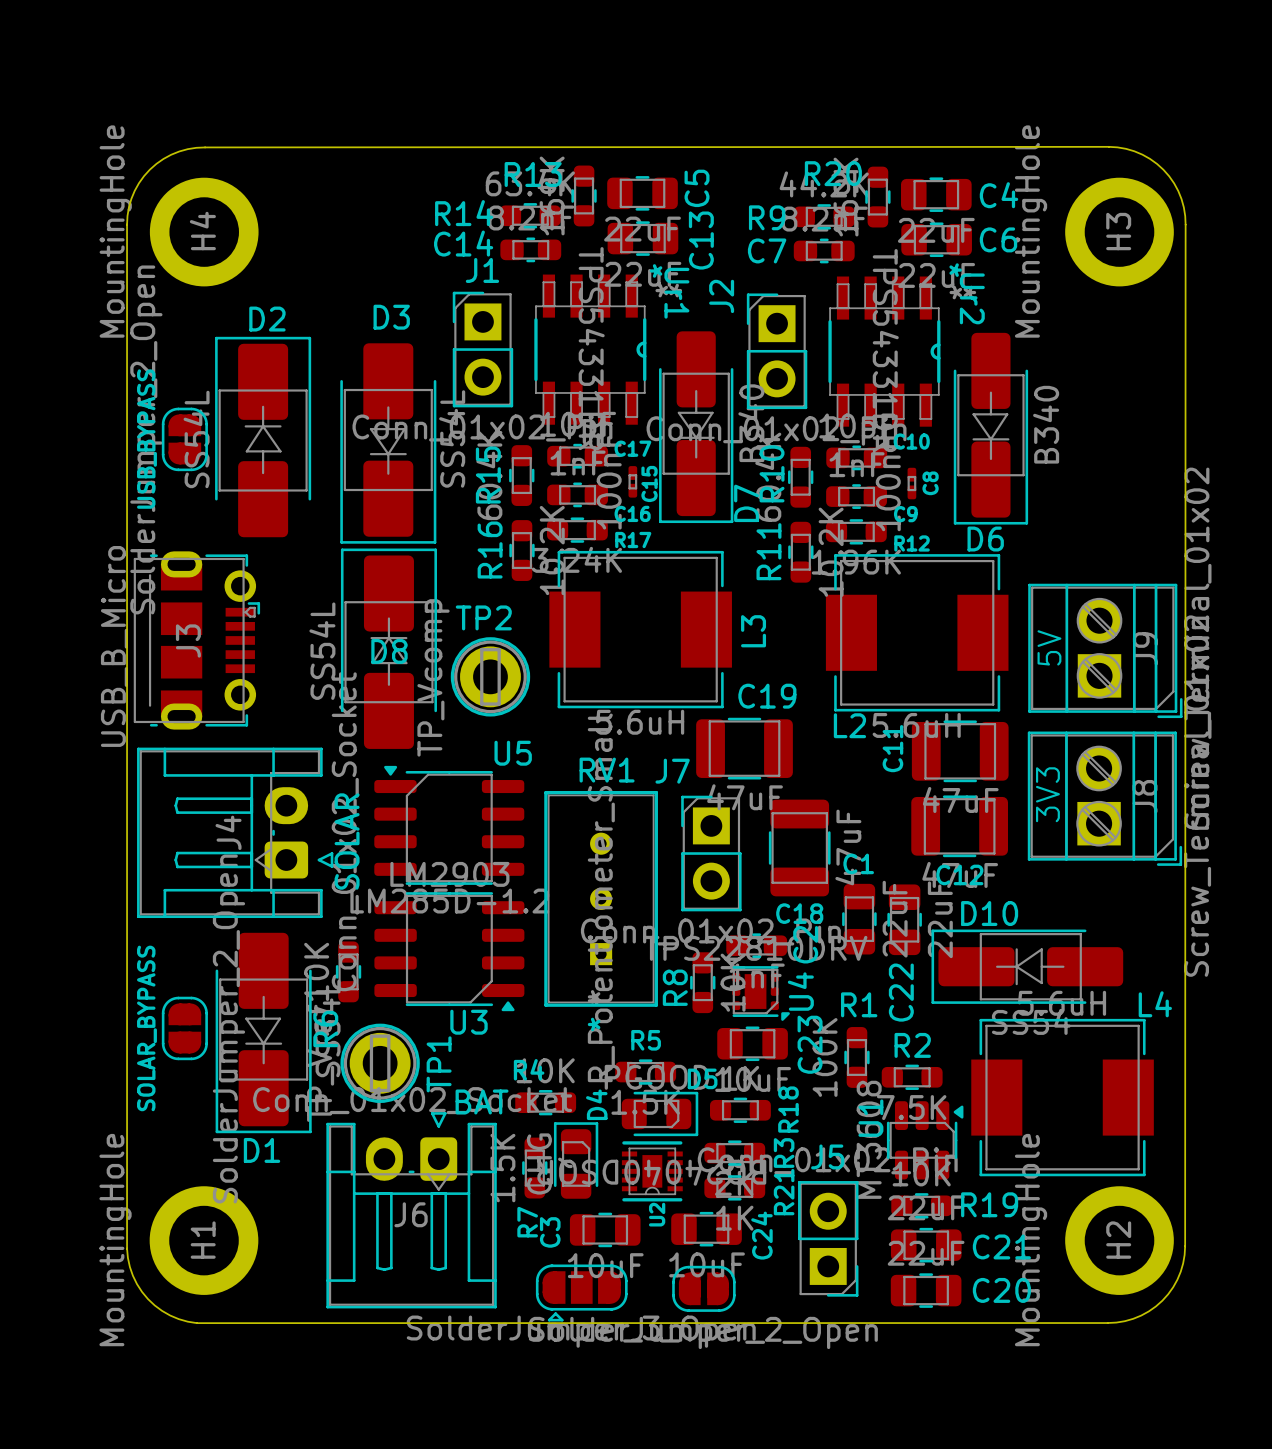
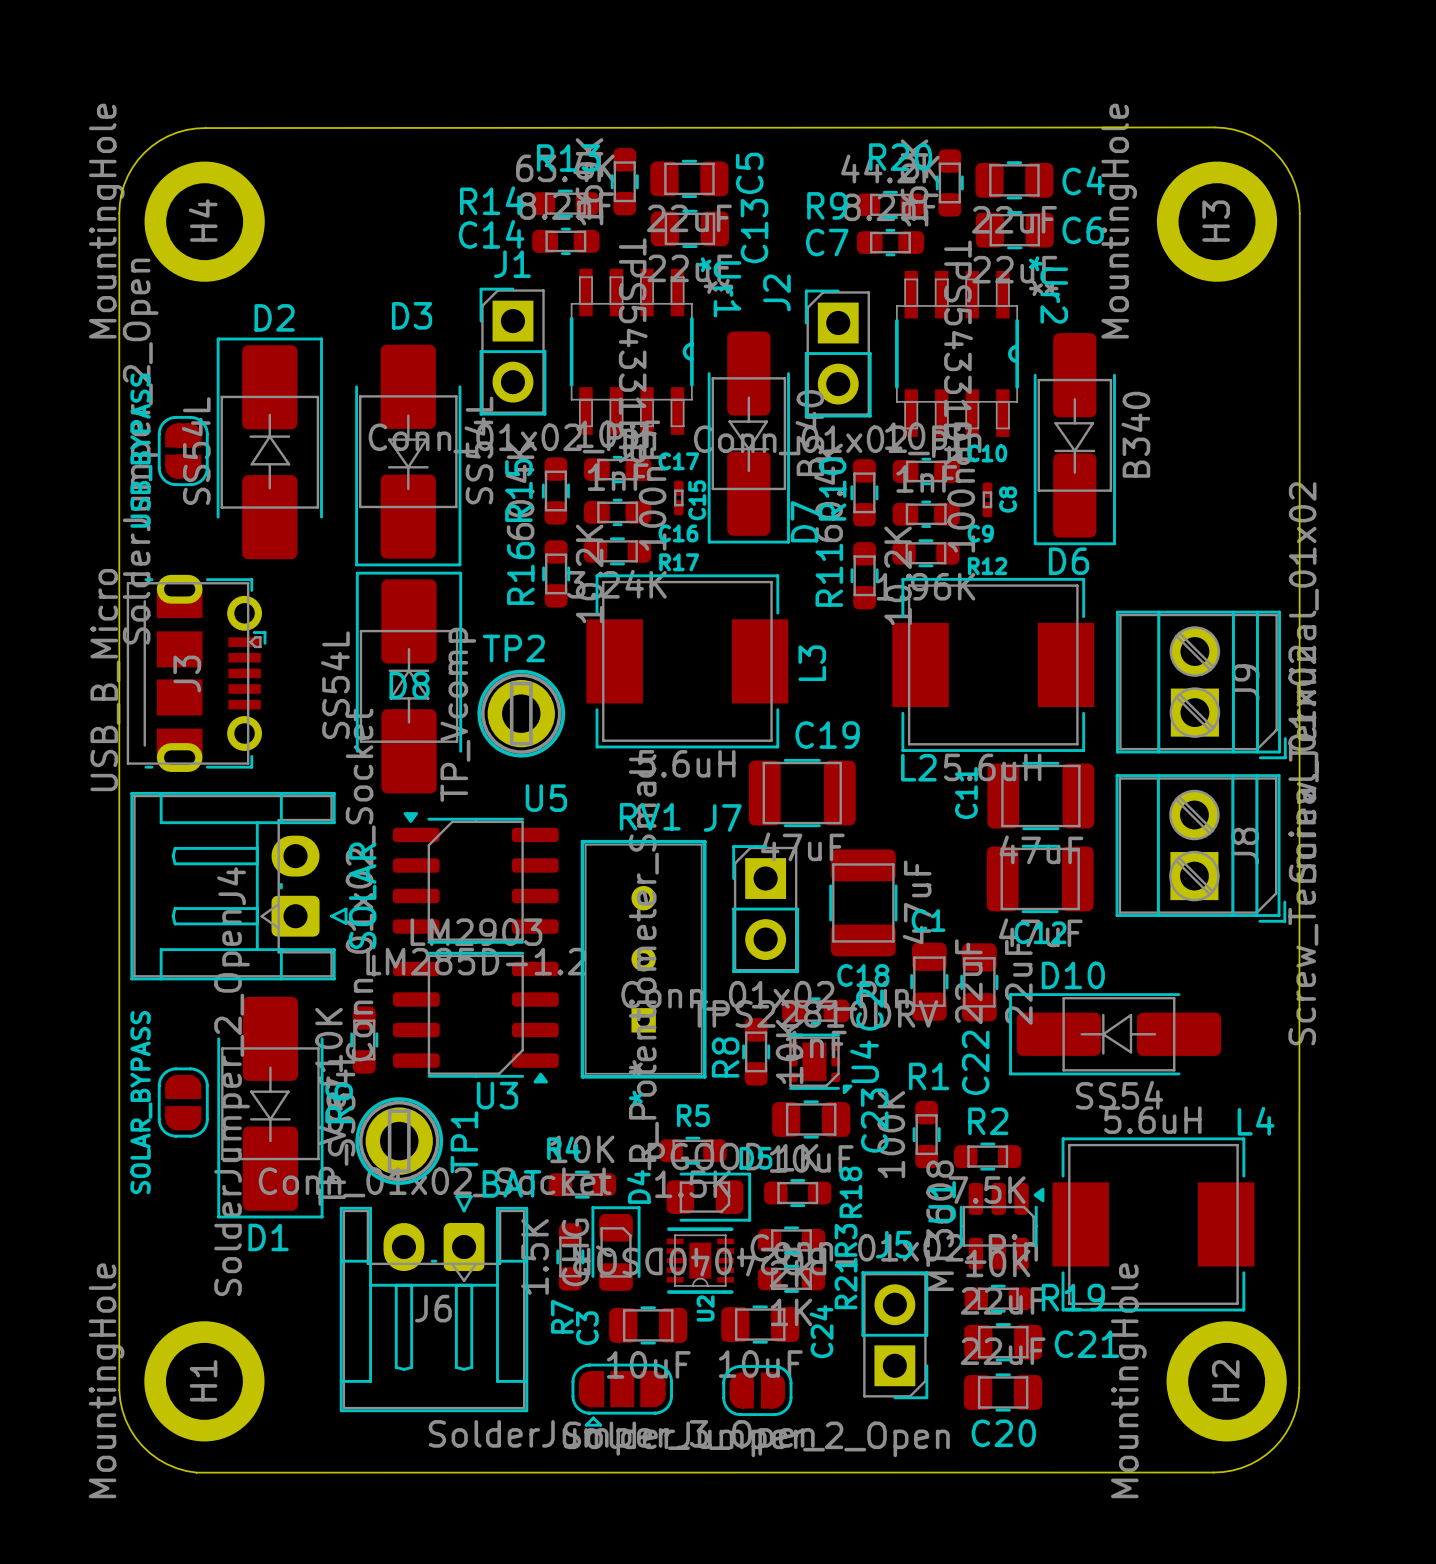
board edge: (1108, 146) (1134, 151) (1149, 158) (1163, 169) (1178, 191) (1185, 216) (1185, 1246) (1180, 1271) (1168, 1294) (1155, 1306) (1141, 1315) (1124, 1321) (1107, 1323) (196, 1323) (170, 1315) (147, 1299) (132, 1275) (127, 1248) -> (1205, 127) (1224, 128) (1243, 132) (1268, 146) (1281, 159) (1291, 176) (1299, 203) (1299, 1387) (1294, 1415) (1280, 1440) (1266, 1454) (1250, 1464) (1232, 1470) (1213, 1472) (196, 1472) (176, 1468) (158, 1459) (142, 1446) (130, 1429) (120, 1400) (119, 1346)
text: 5V (1049, 647) -> none
text: 3V3 (1047, 794) -> none
L4 position: (1062, 1097) -> (1153, 1224)
H1 position: (203, 1240) -> (204, 1381)
H2 position: (1119, 1240) -> (1226, 1381)
C20 name position: C20 (1001, 1290) -> C20 (1003, 1433)

